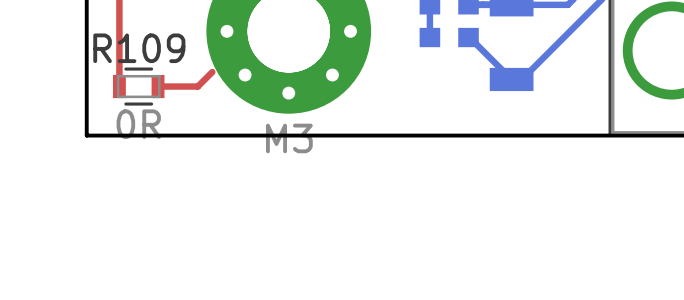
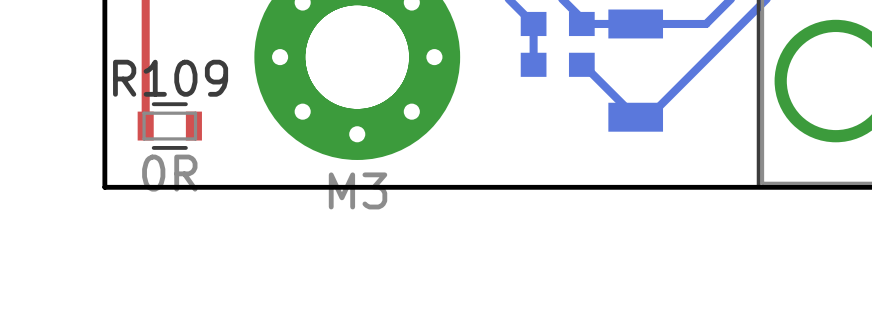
top track: (212, 72) (197, 86) (158, 86) -> none

